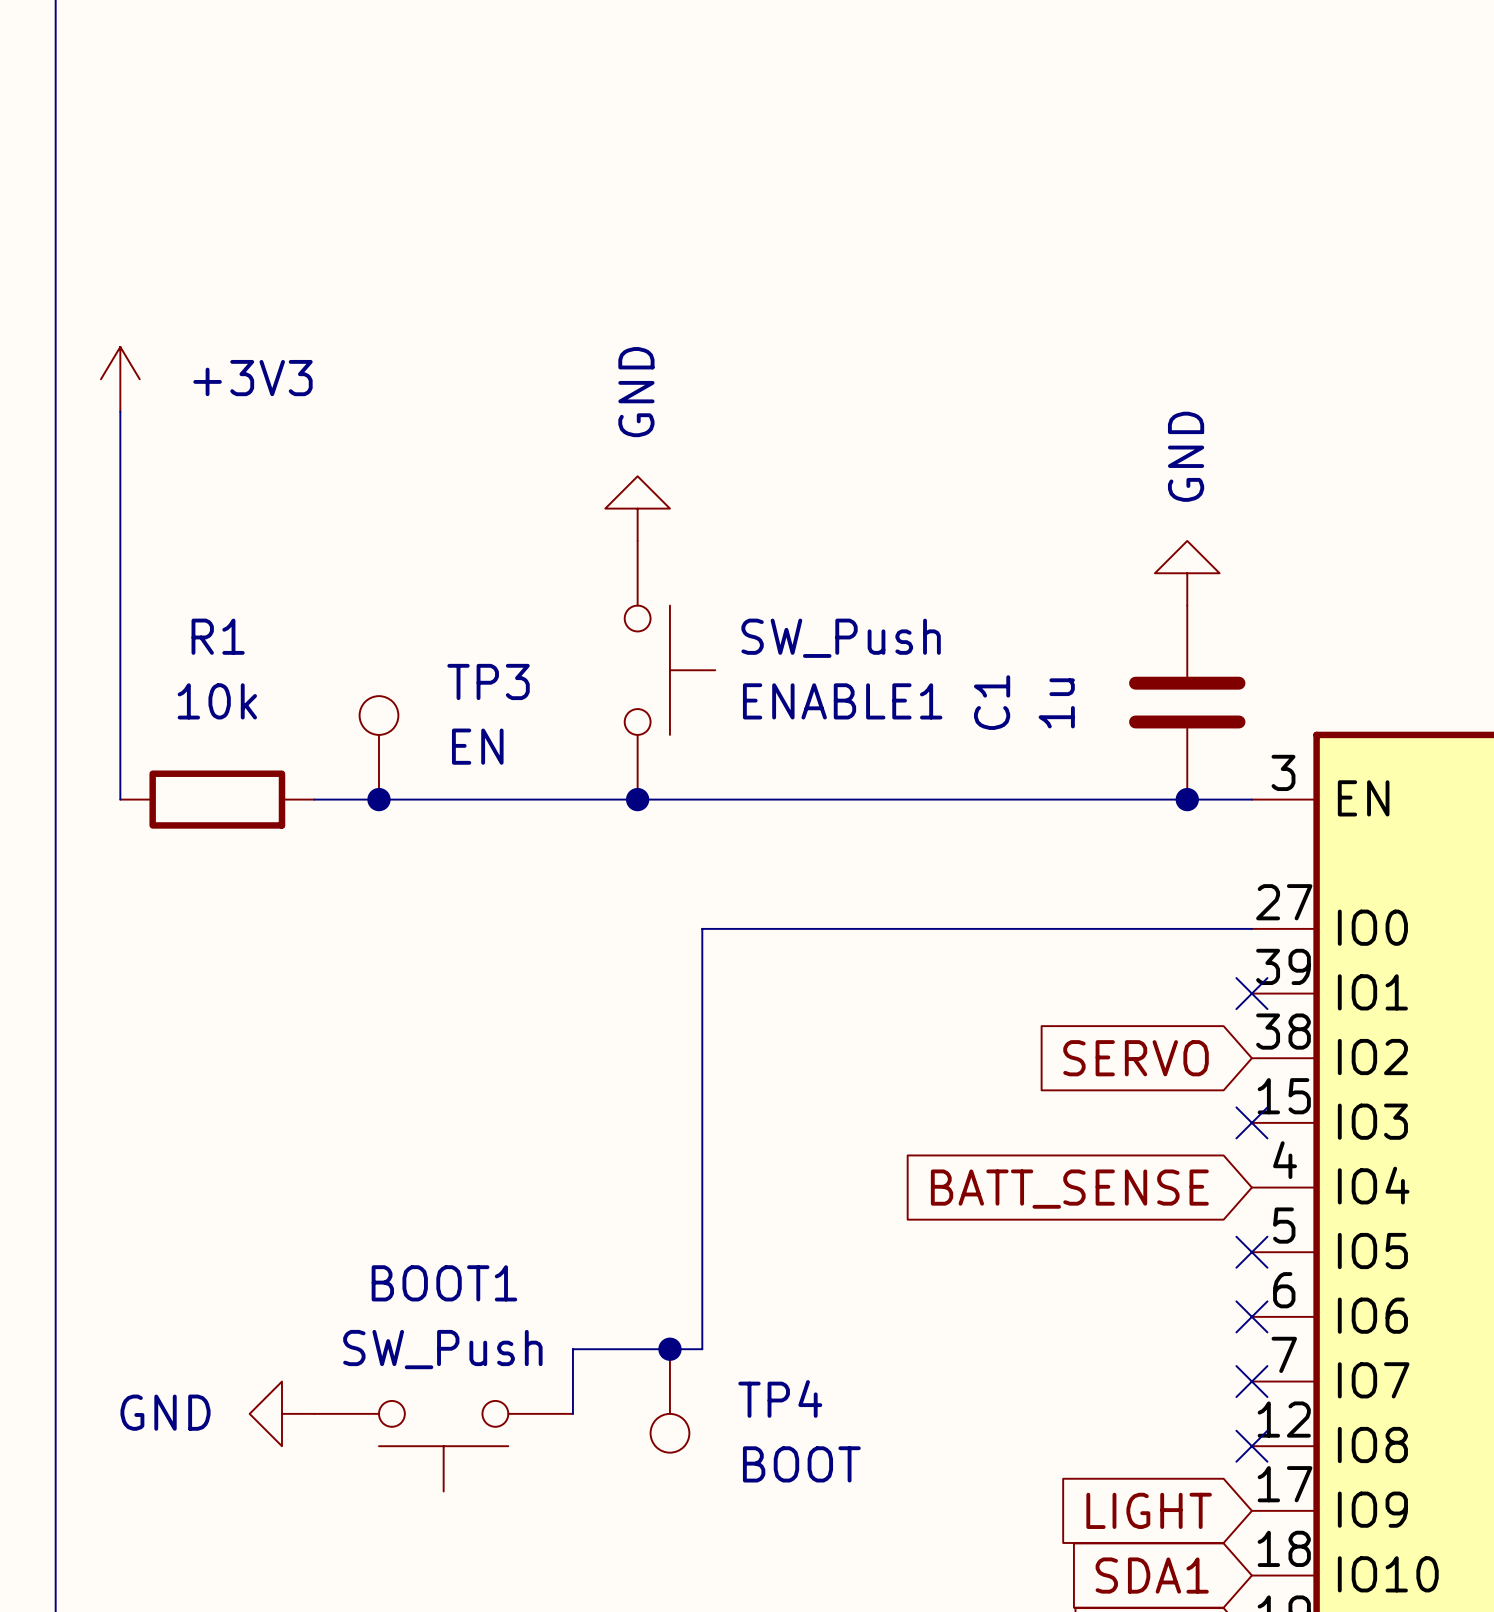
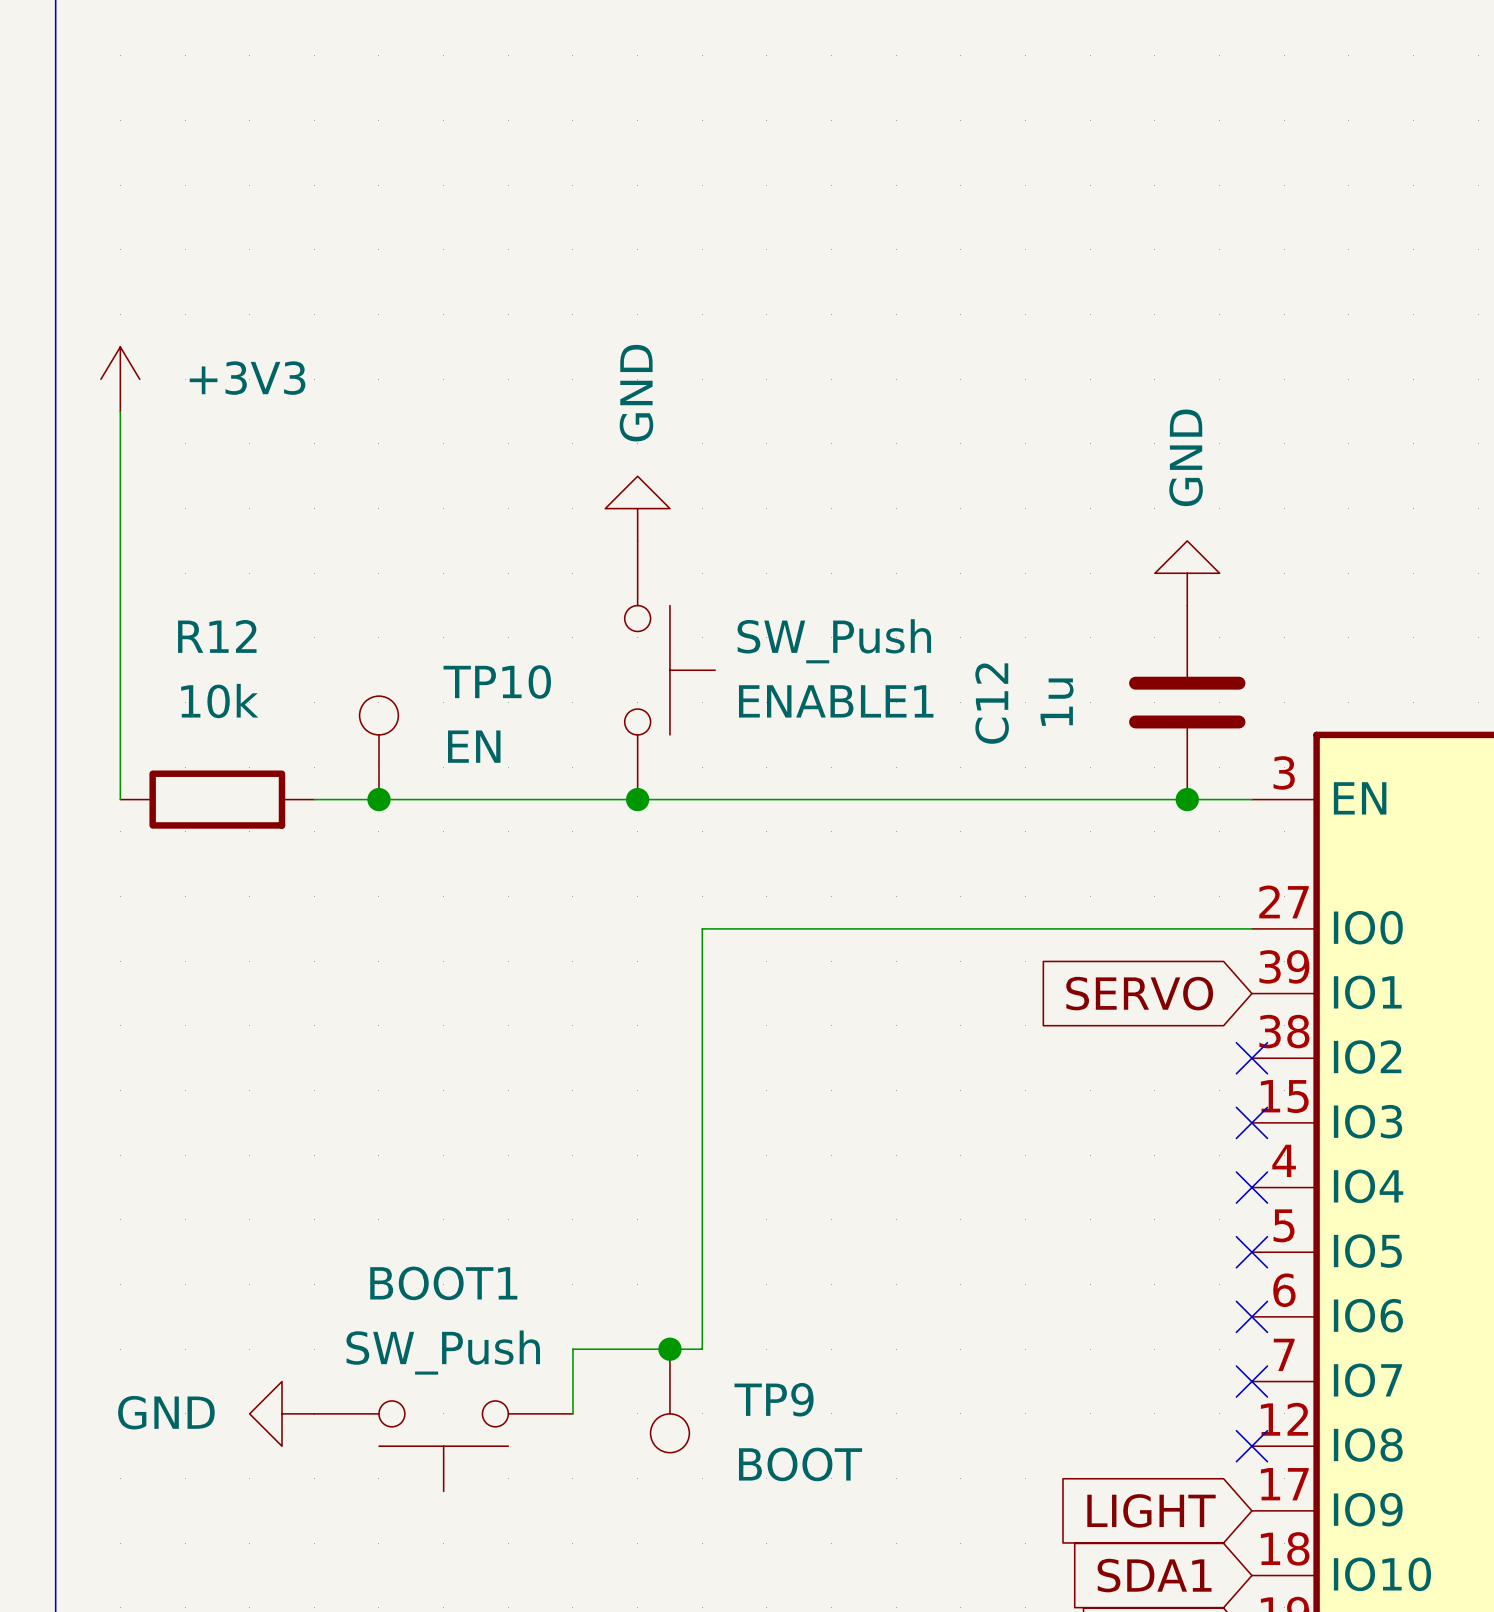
R1 name: R1 (218, 636) -> R12 (217, 636)
TP3 name: TP3 (488, 681) -> TP10 (497, 682)
C1 name: C1 (992, 702) -> C12 (992, 703)
no-connect mark position: (1251, 993) -> (1251, 1058)
global label position: SERVO (1136, 1058) -> SERVO (1139, 993)
no-connect mark: none -> (1251, 1187)
global label: BATT_SENSE (1069, 1189) -> none
TP4 name: TP4 (780, 1398) -> TP9 (774, 1399)

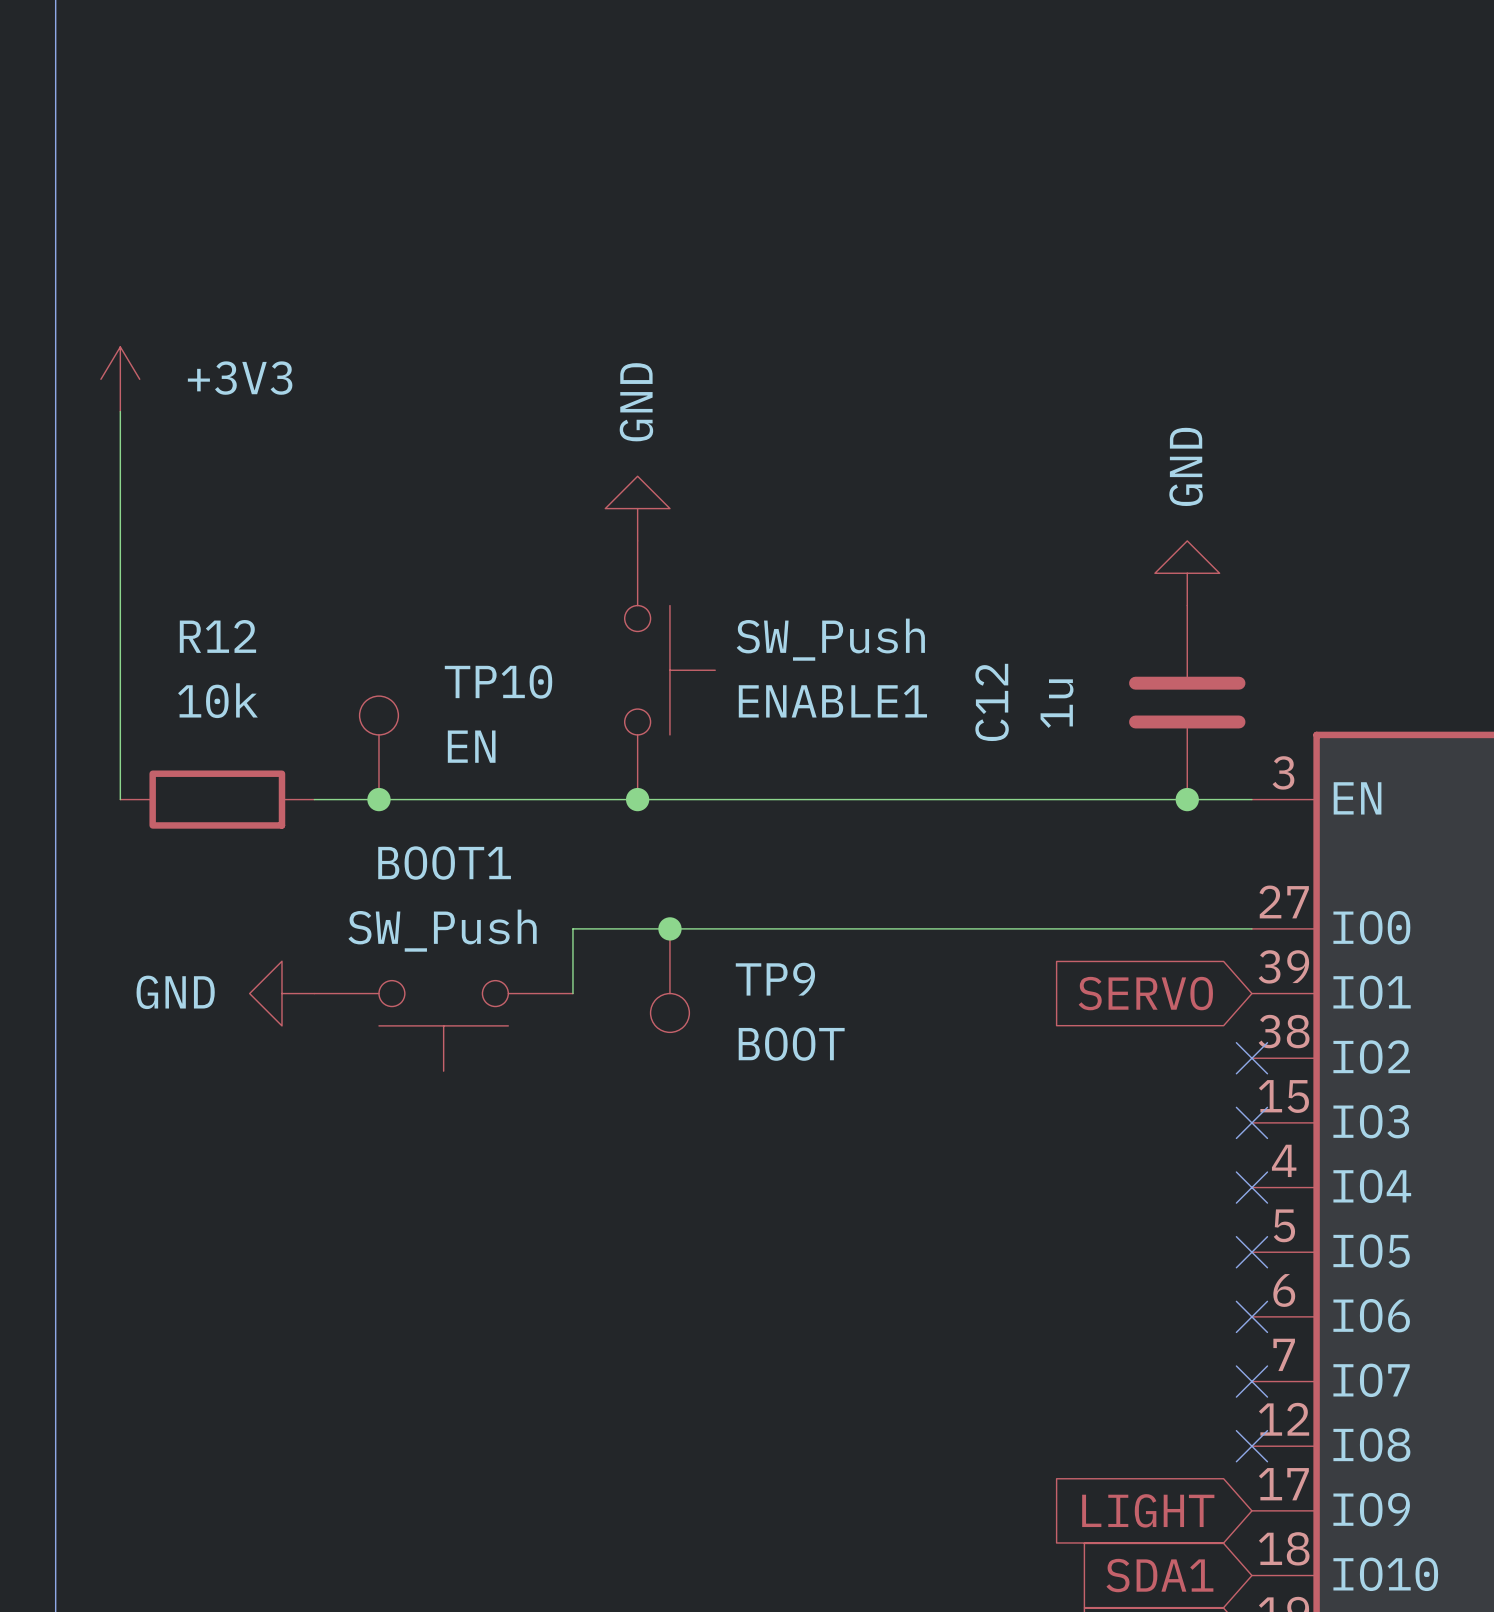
junction: none -> (669, 928)
wire: (702, 928) (702, 1349) (572, 1349) (572, 1413) -> (702, 928) (572, 928) (572, 993)
junction: (669, 1349) -> none
TP9 position: (669, 1400) -> (669, 980)
power symbol position: GND (281, 1413) -> GND (281, 993)
BOOT1 position: (443, 1446) -> (443, 1025)

